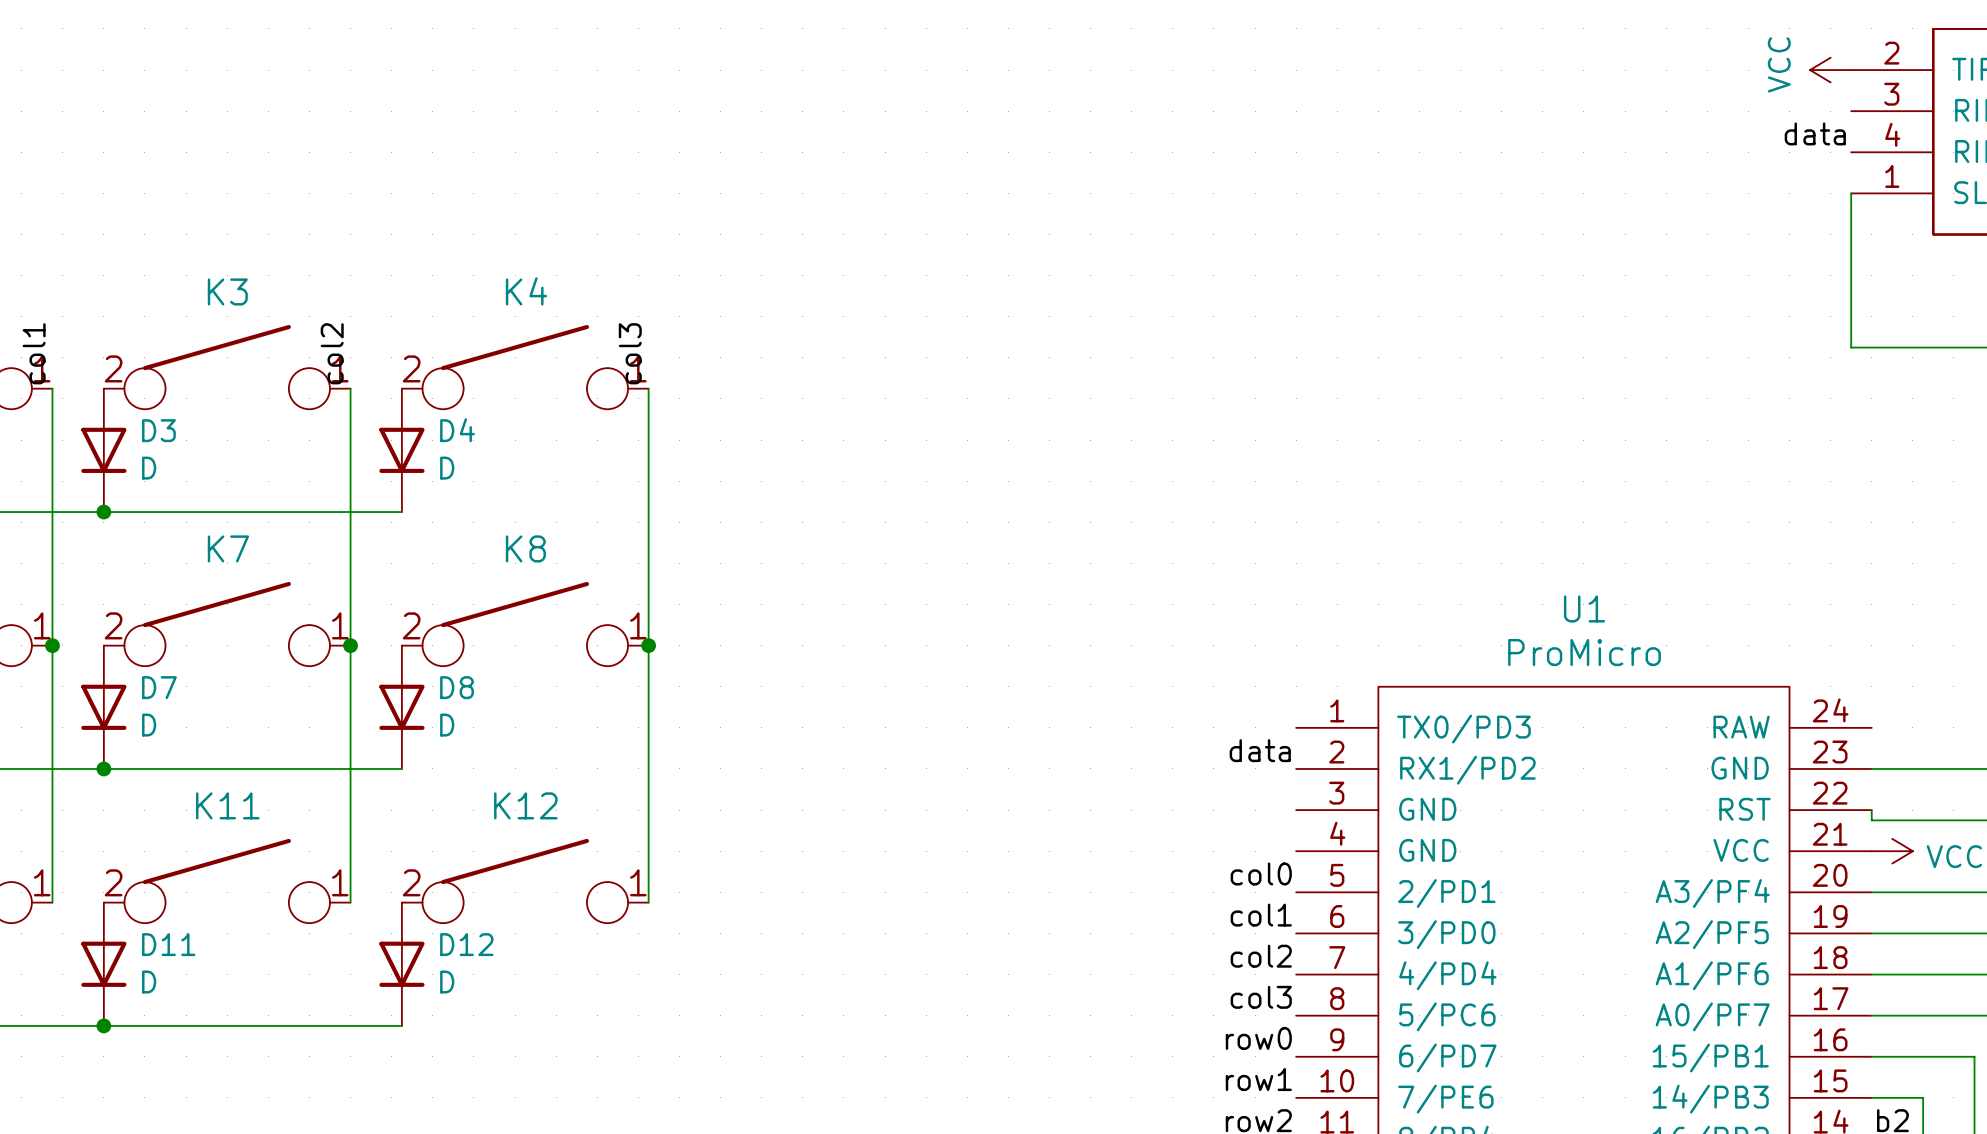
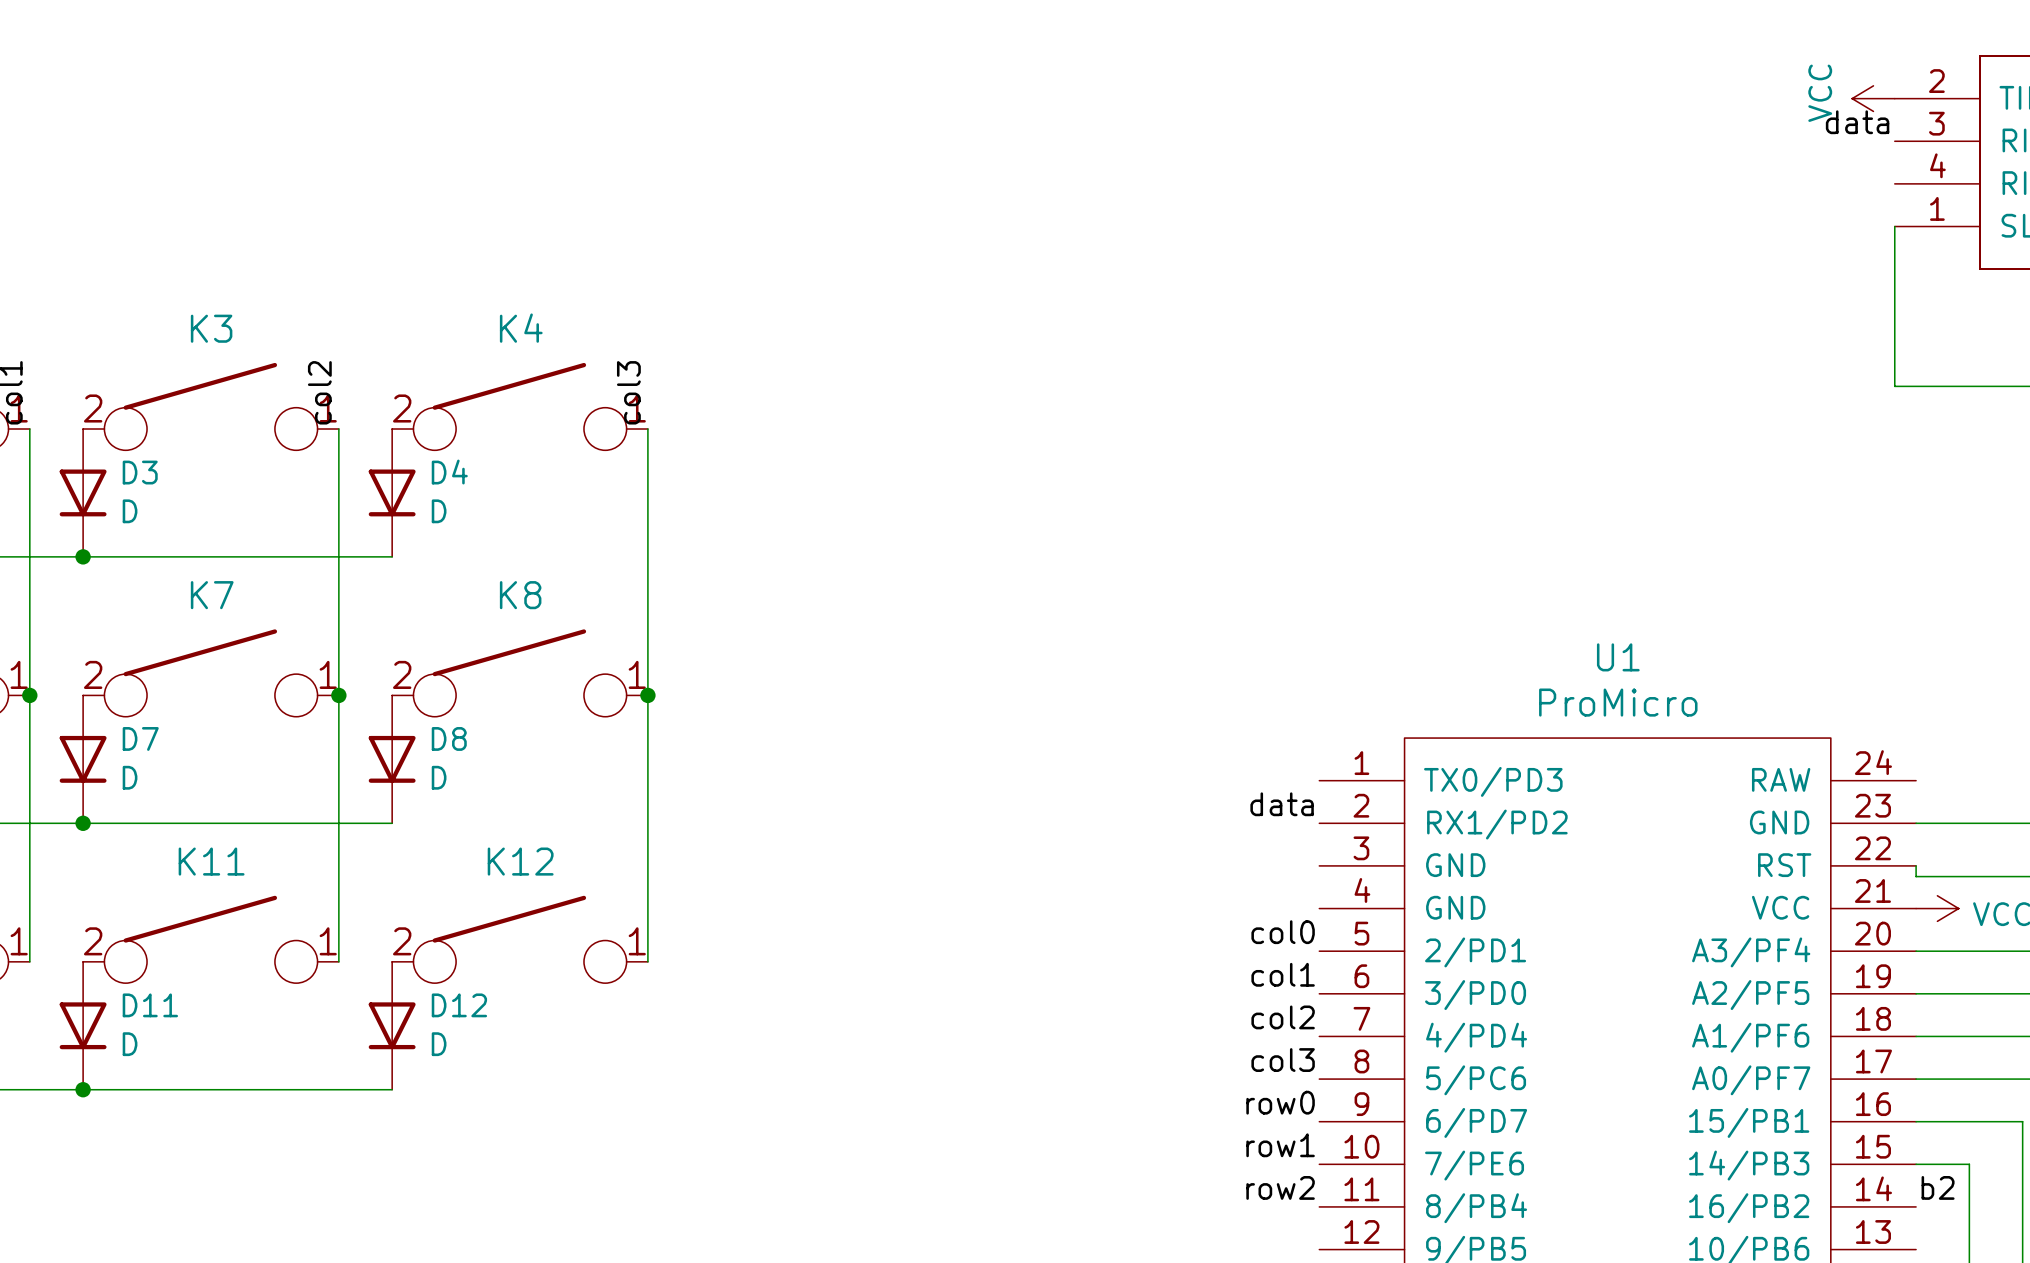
label position: data (1815, 133) -> data (1857, 122)

